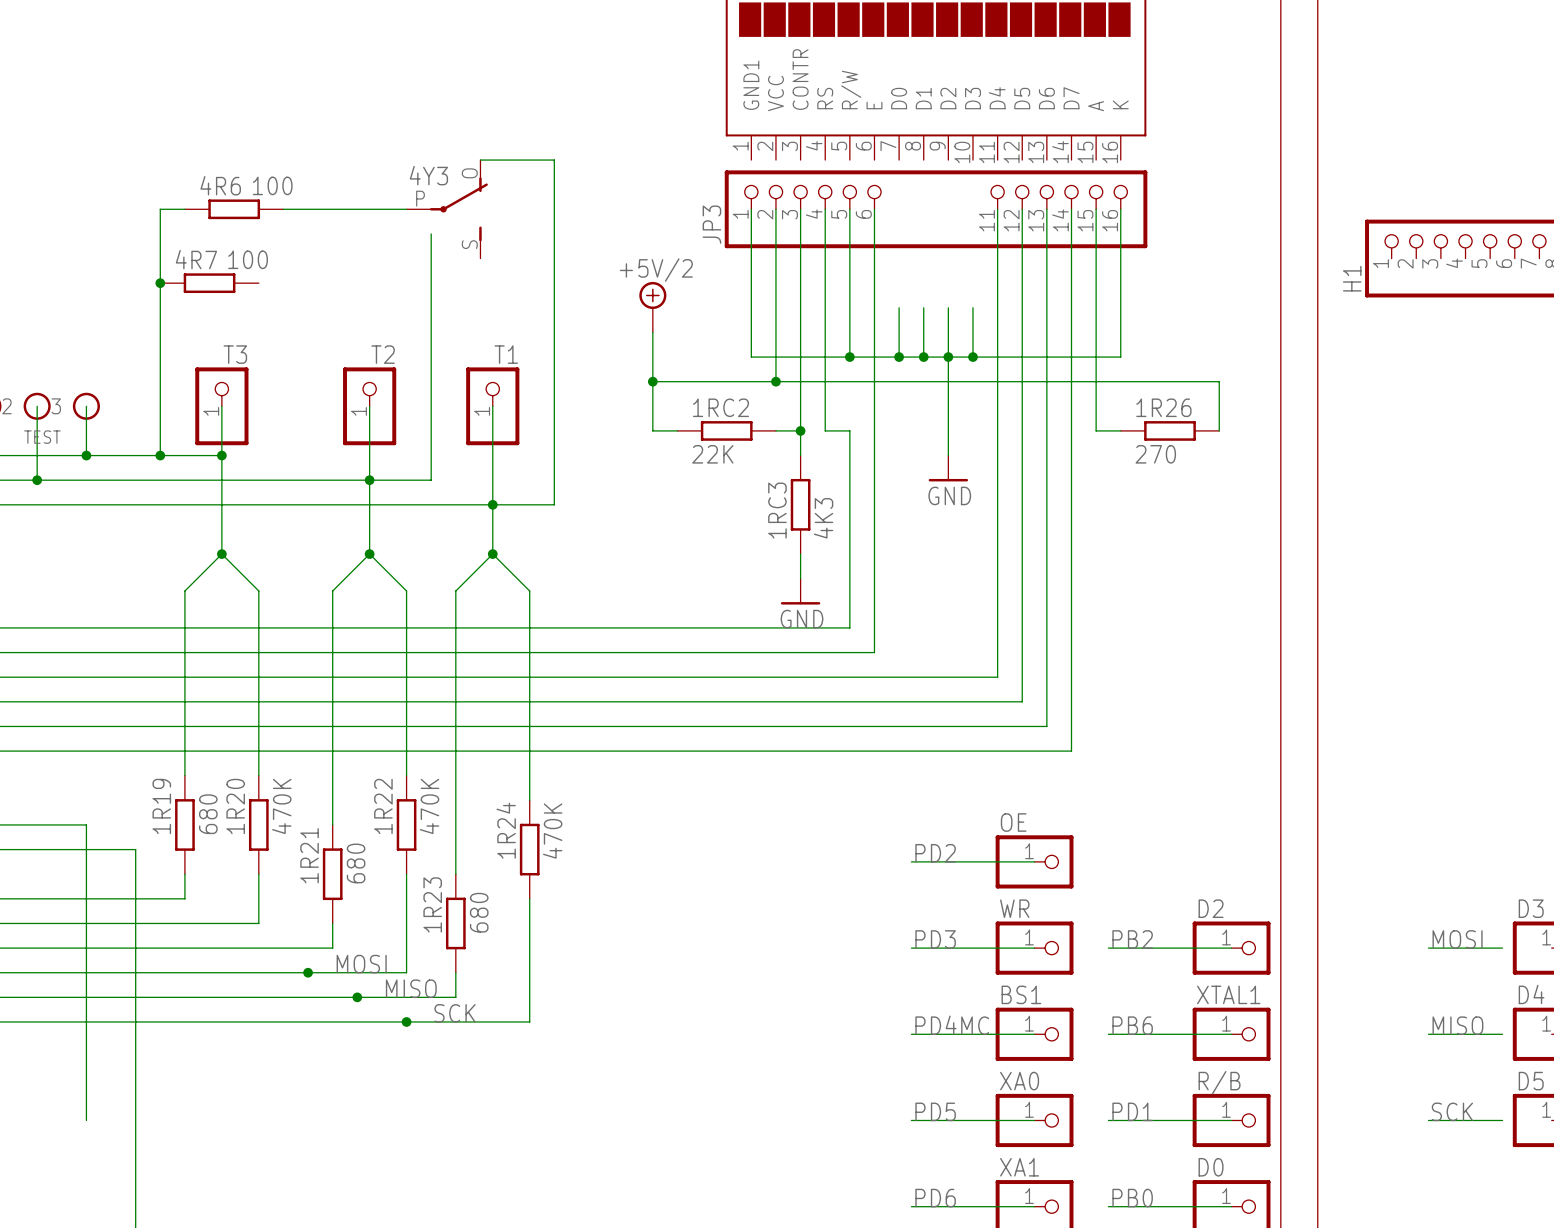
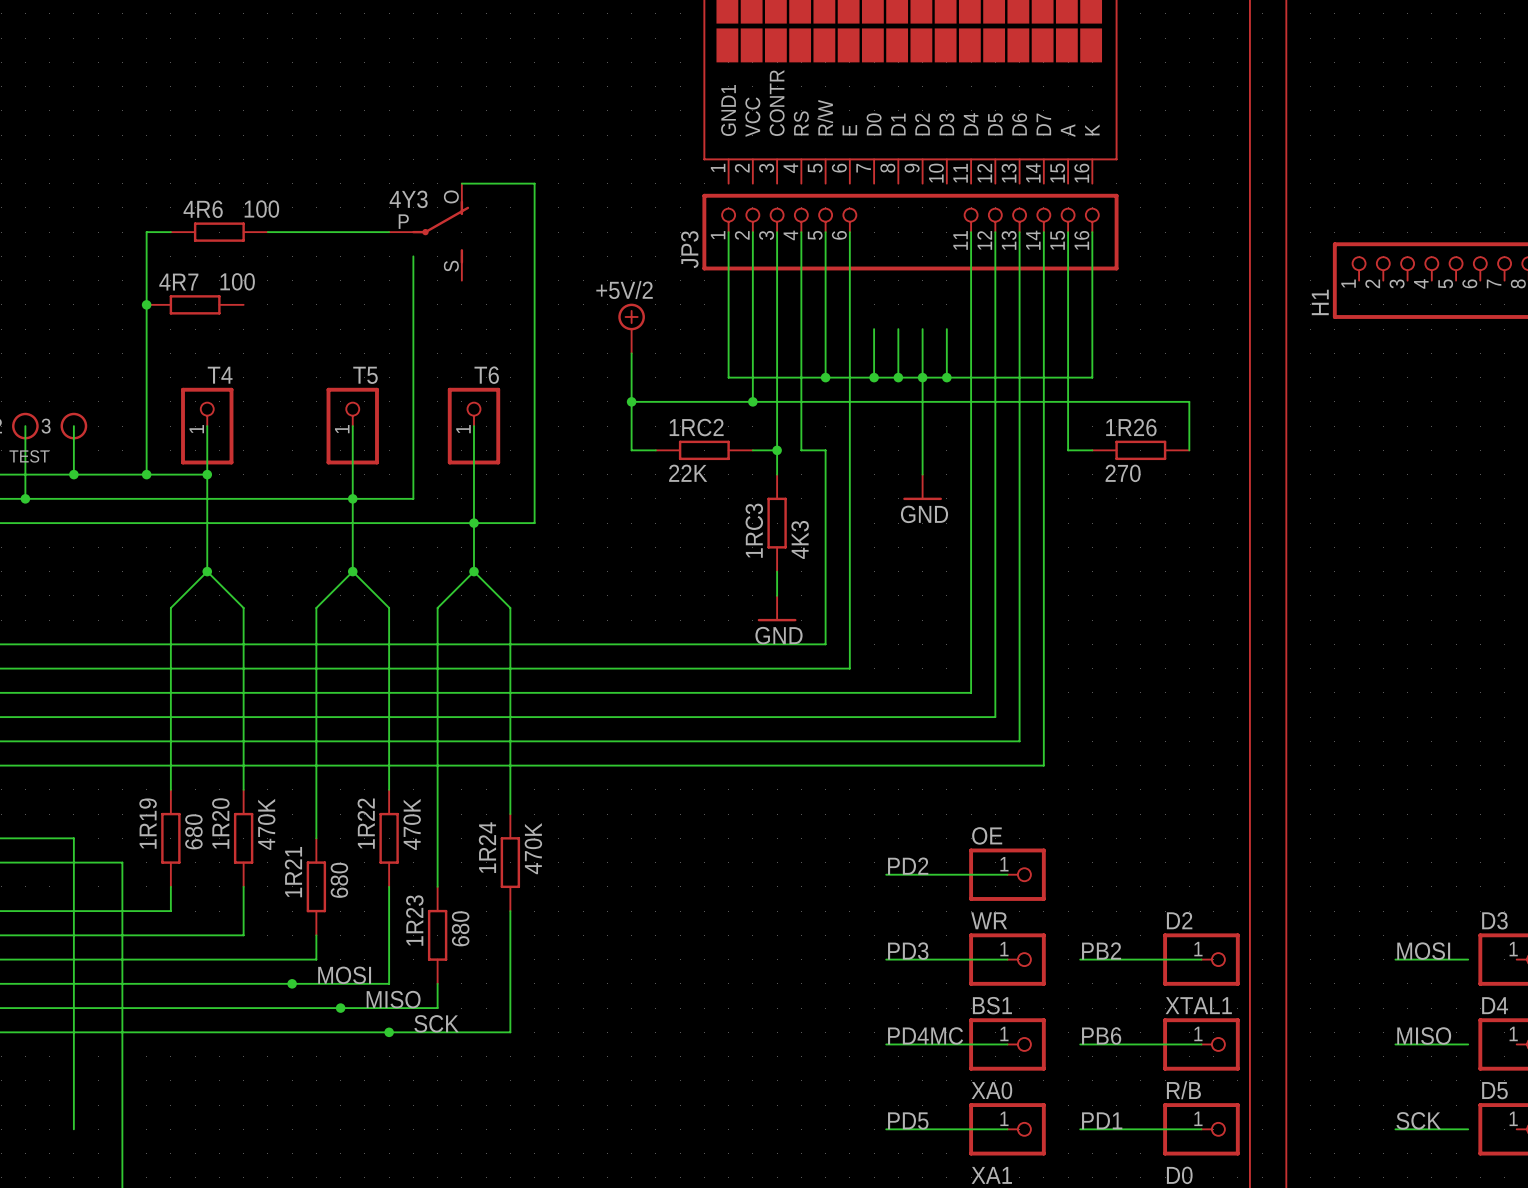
T3 name: T3 (235, 354) -> T4 (220, 375)
T2 name: T2 (383, 354) -> T5 (365, 375)
T1 name: T1 (506, 354) -> T6 (486, 375)

